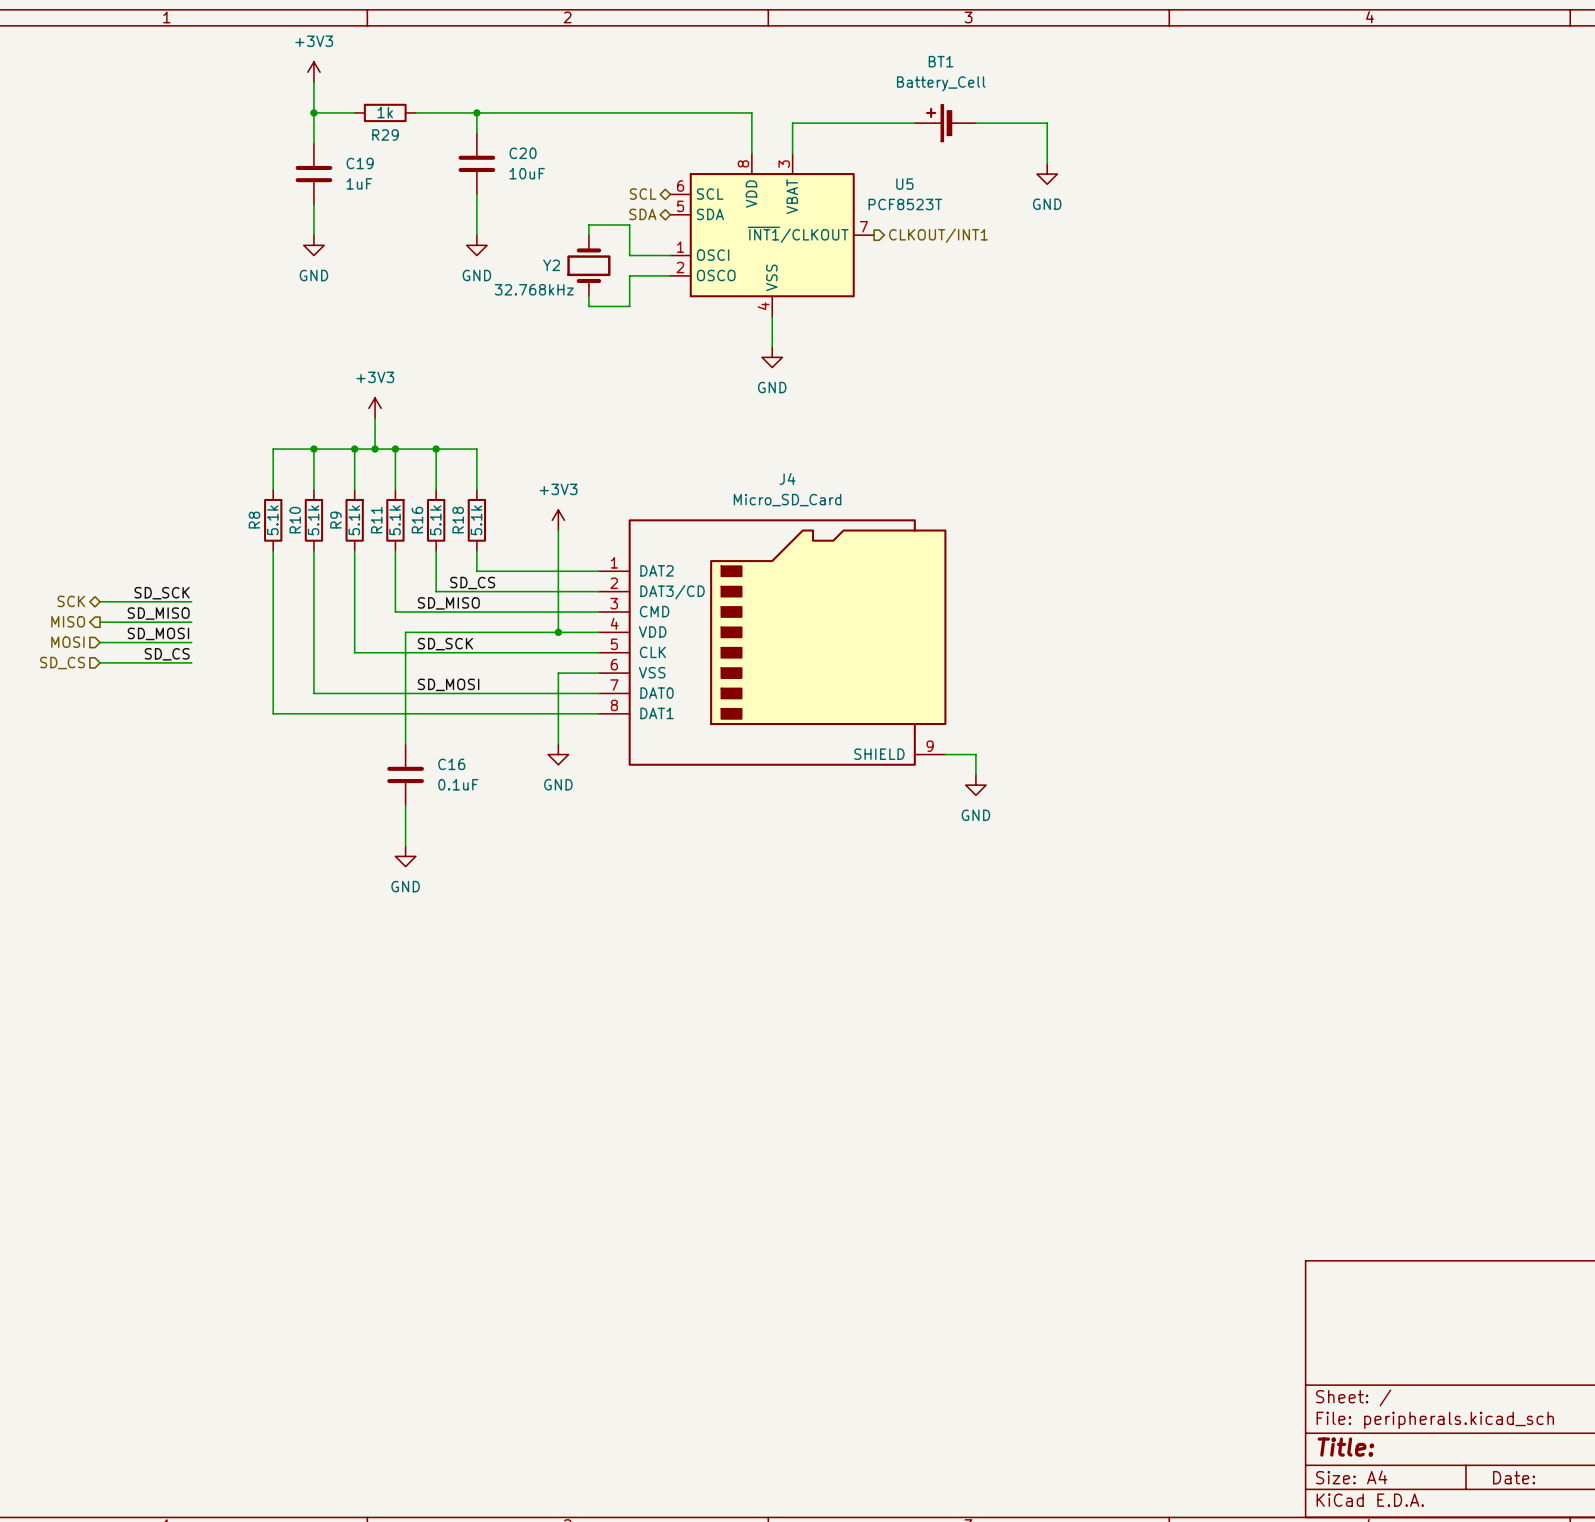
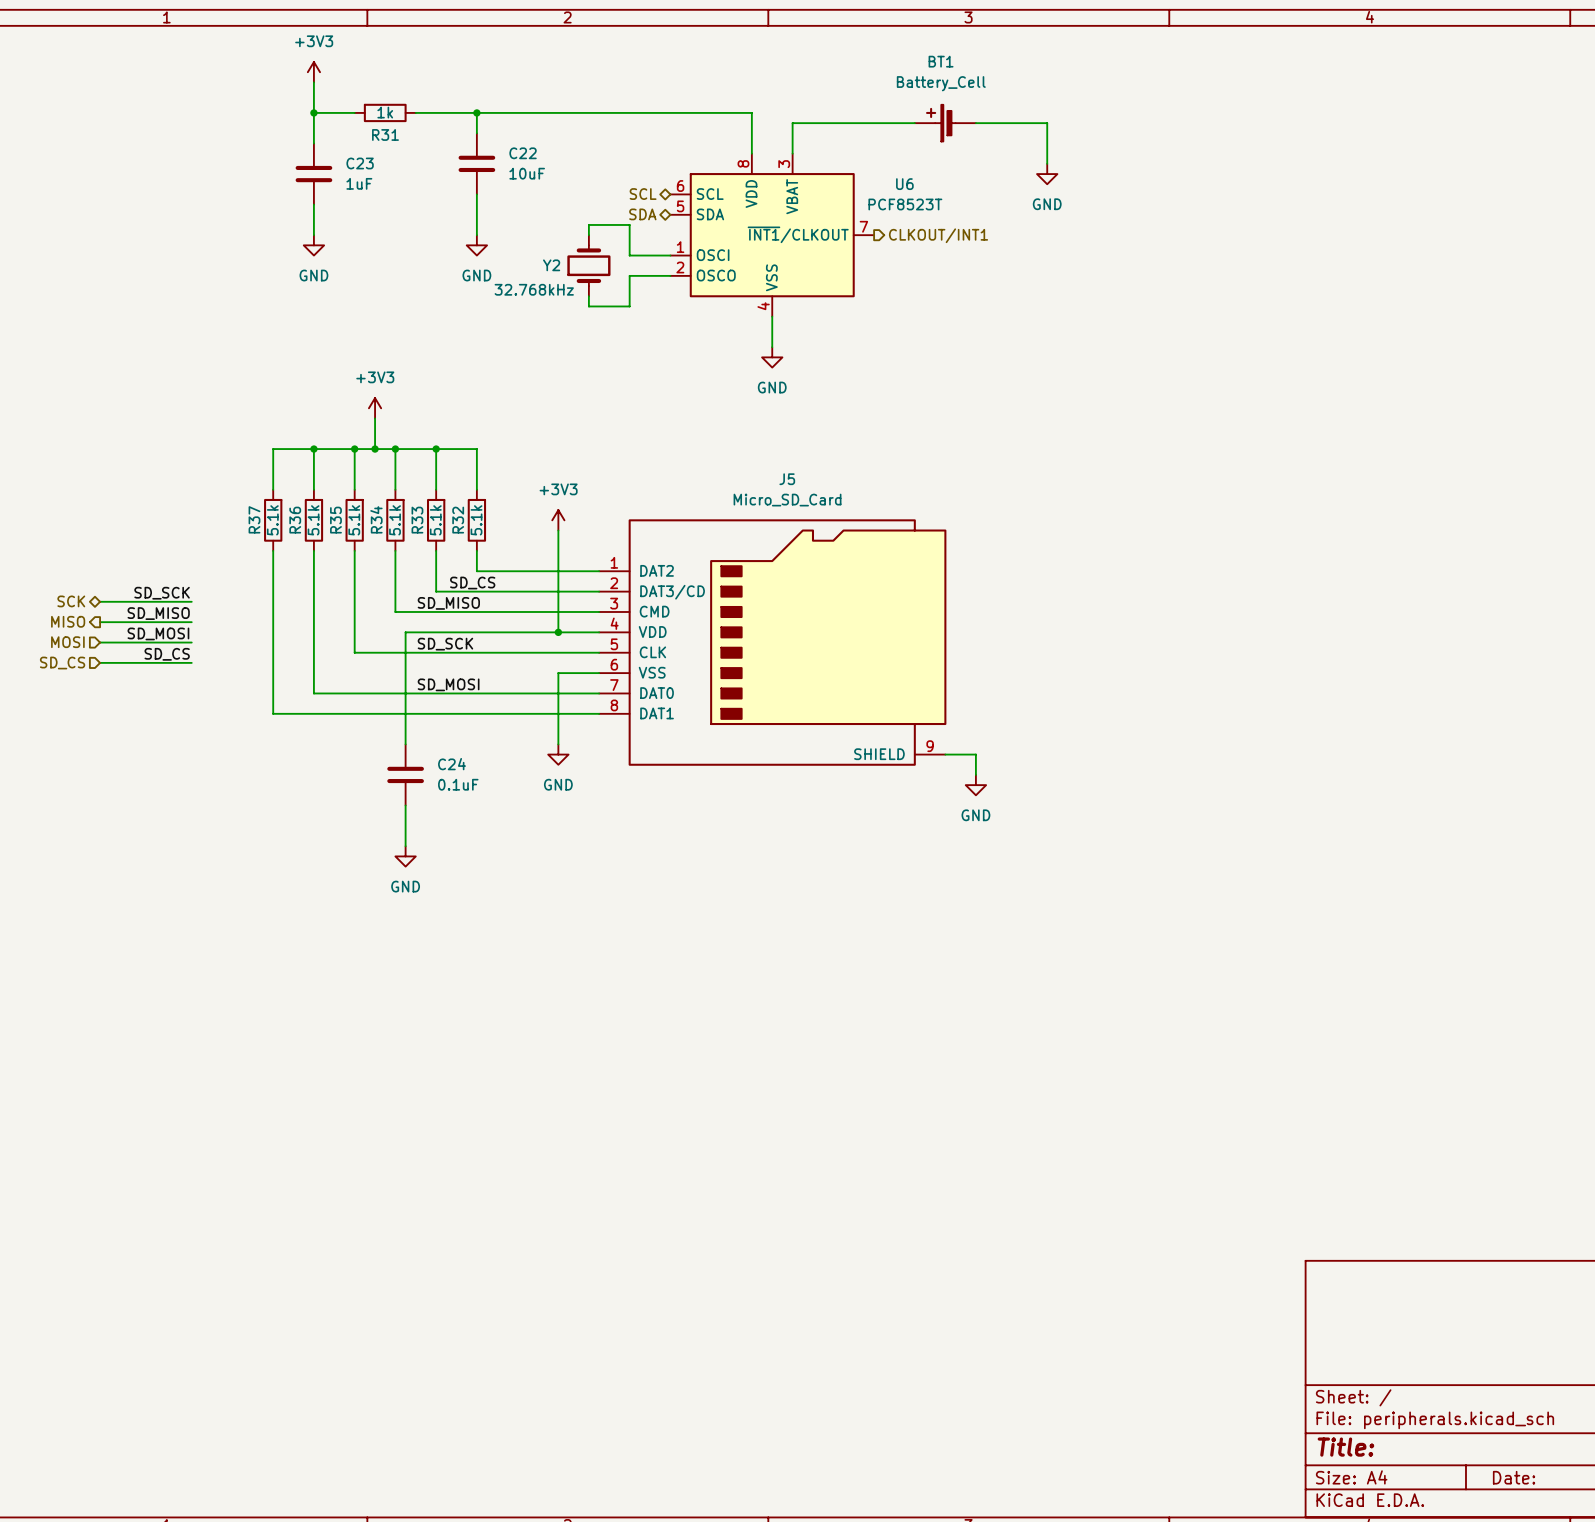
R29 name: R29 (385, 134) -> R31 (385, 134)
C20 name: C20 (523, 153) -> C22 (523, 153)
C19 name: C19 (360, 163) -> C23 (360, 163)
U5 name: U5 (904, 184) -> U6 (904, 184)
J4 name: J4 (787, 478) -> J5 (787, 479)
R8 name: R8 (254, 520) -> R37 (254, 519)
R10 name: R10 (295, 520) -> R36 (295, 520)
R9 name: R9 (335, 520) -> R35 (335, 520)
R11 name: R11 (376, 520) -> R34 (376, 519)
R16 name: R16 (417, 520) -> R33 (417, 520)
R18 name: R18 (458, 520) -> R32 (458, 520)
C16 name: C16 (451, 764) -> C24 (451, 764)

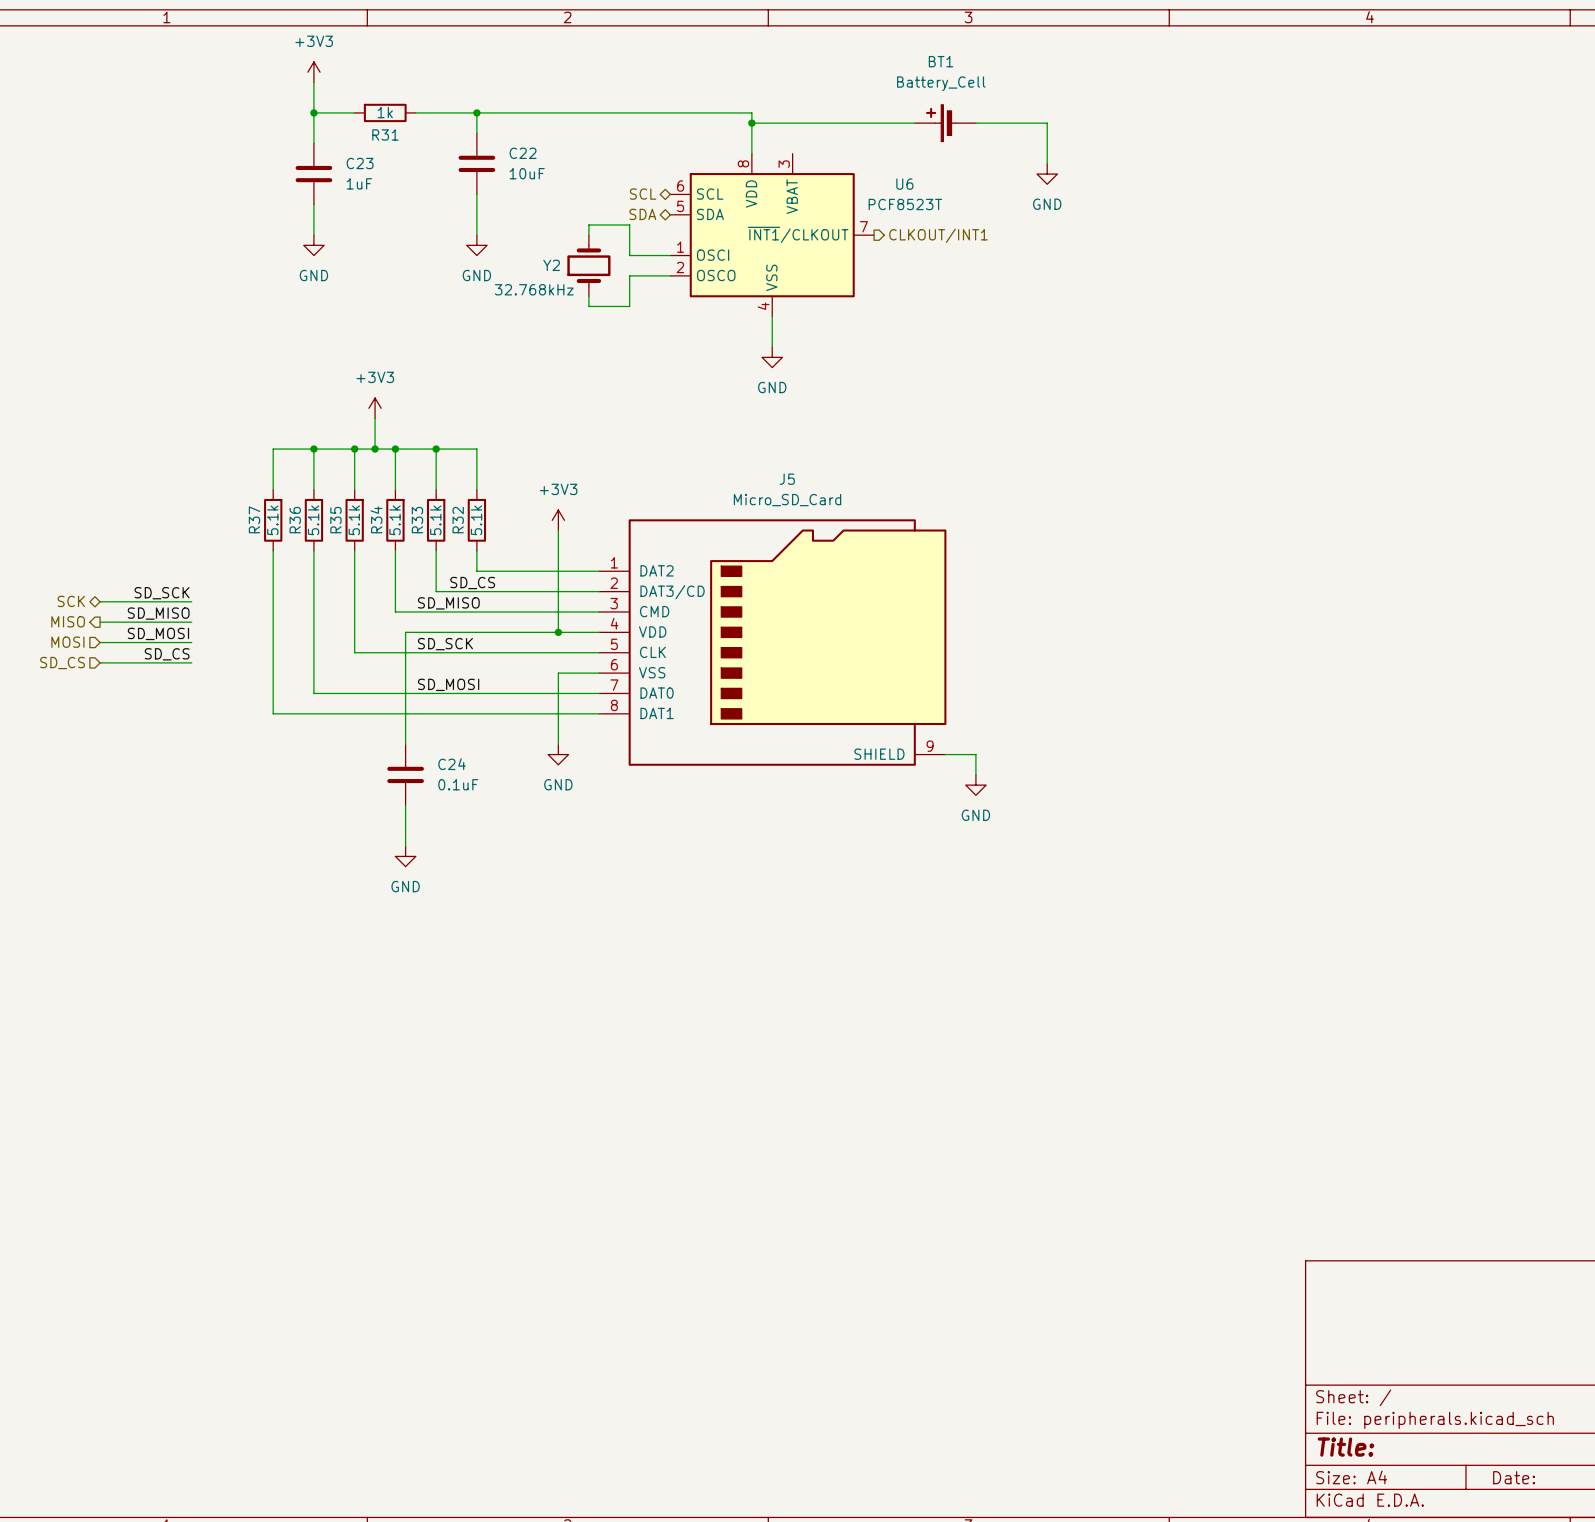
junction: none -> (751, 123)
wire: (792, 123) (792, 153) -> (792, 123) (751, 123)

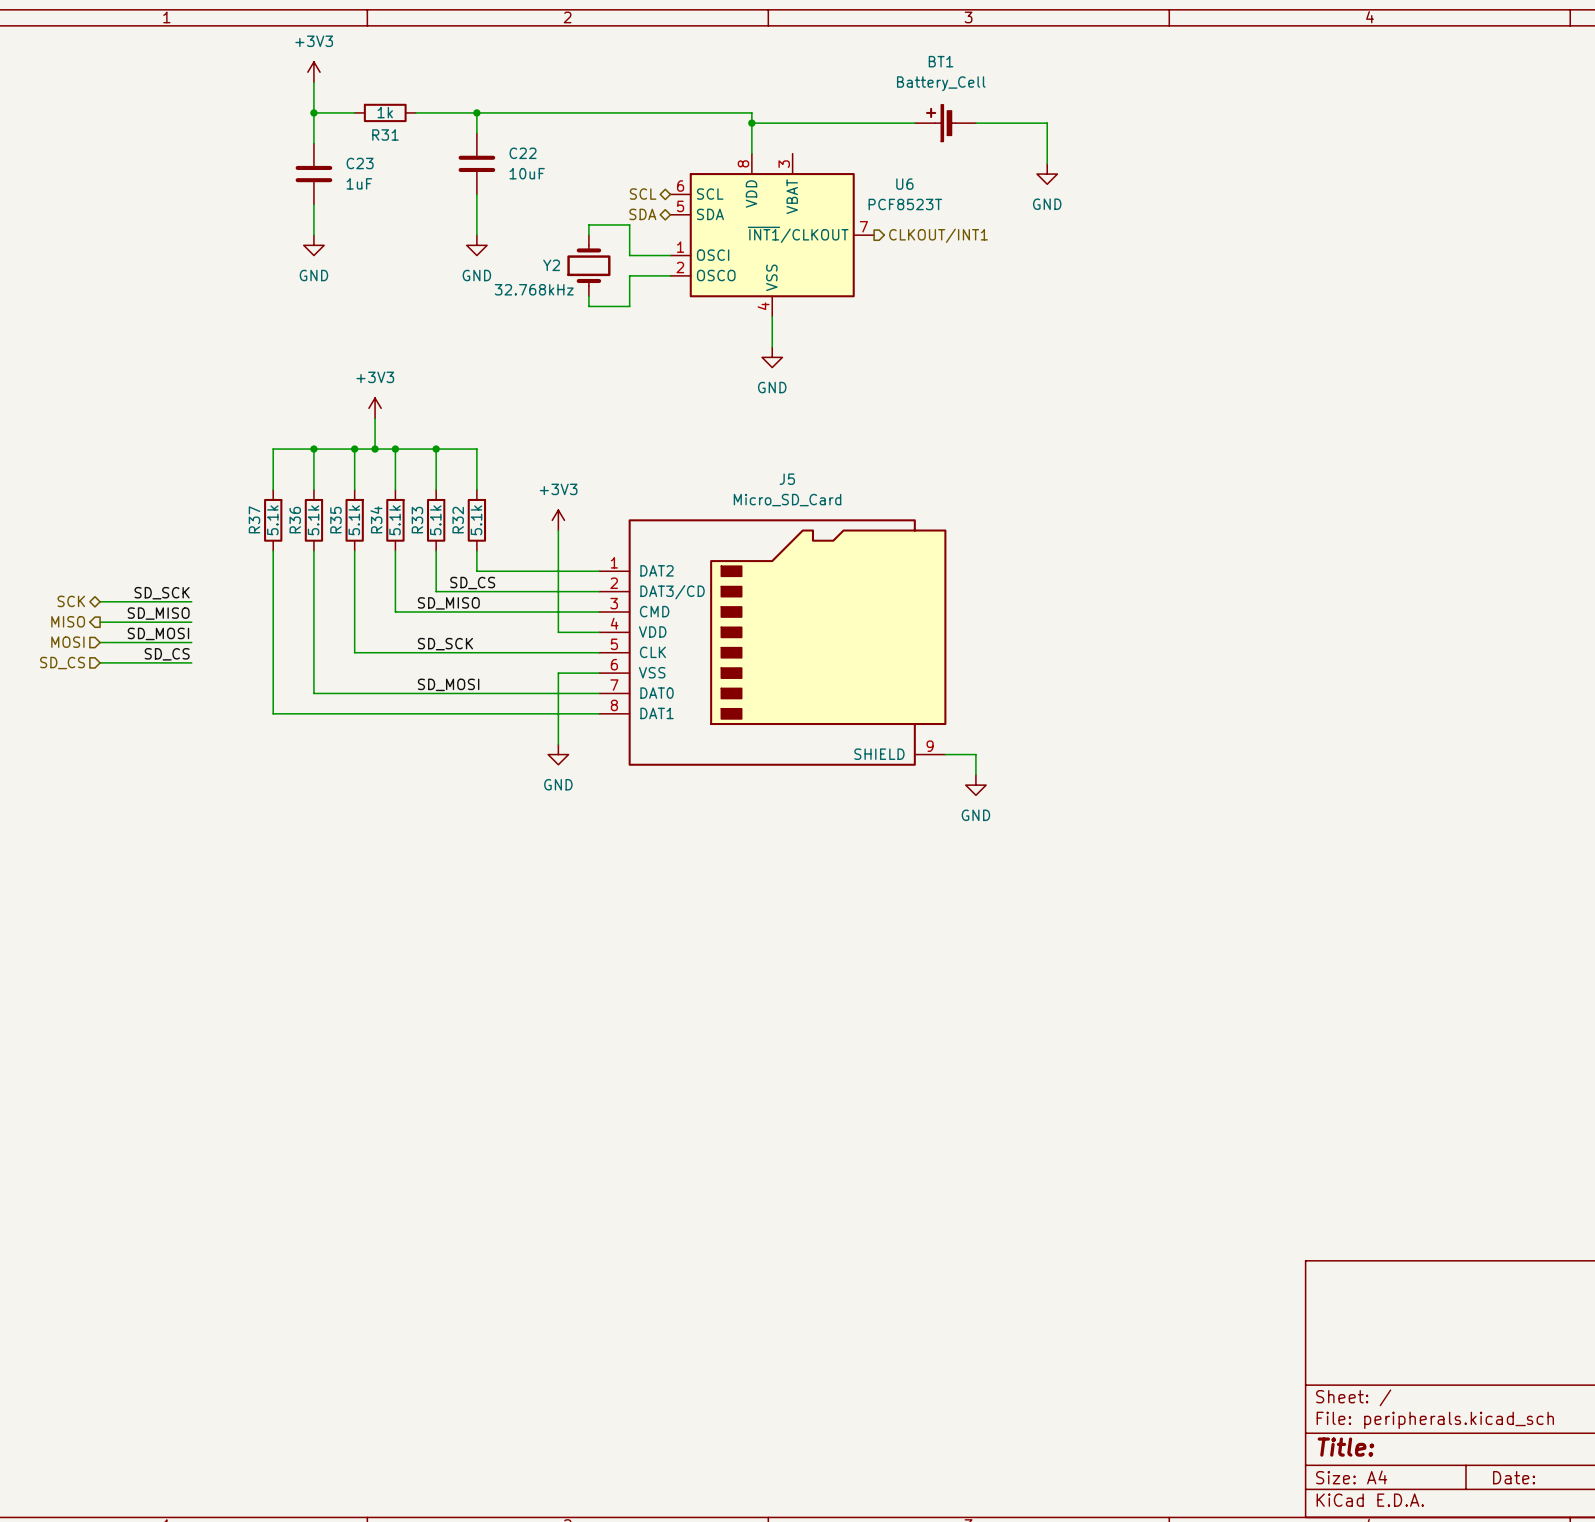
wire: (558, 632) (405, 632) (405, 744) -> none
junction: (558, 632) -> none
C24: 0.1uF (405, 774) -> none
wire: (405, 805) (405, 846) -> none
power symbol: GND (405, 856) -> none

